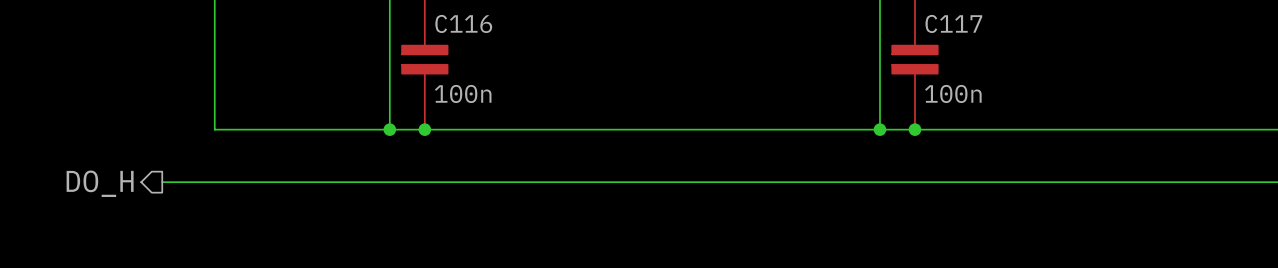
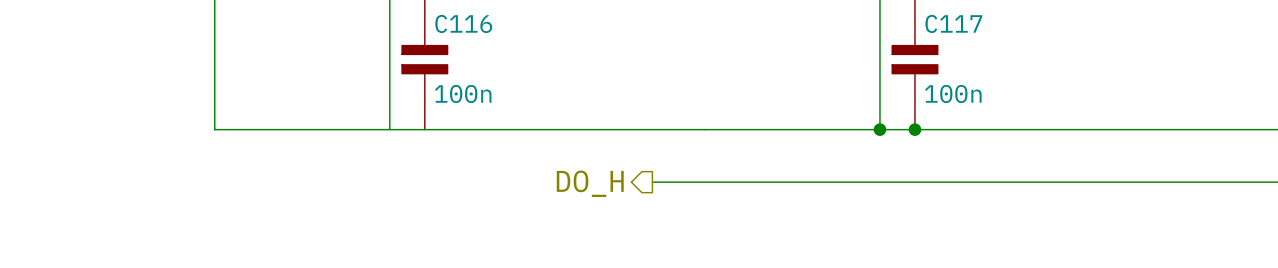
junction: (389, 129) -> none
junction: (424, 129) -> none
wire: (162, 182) (652, 182) -> none
hierarchical label: DO_H (100, 183) -> none
hierarchical label: none -> DO_H (590, 183)

